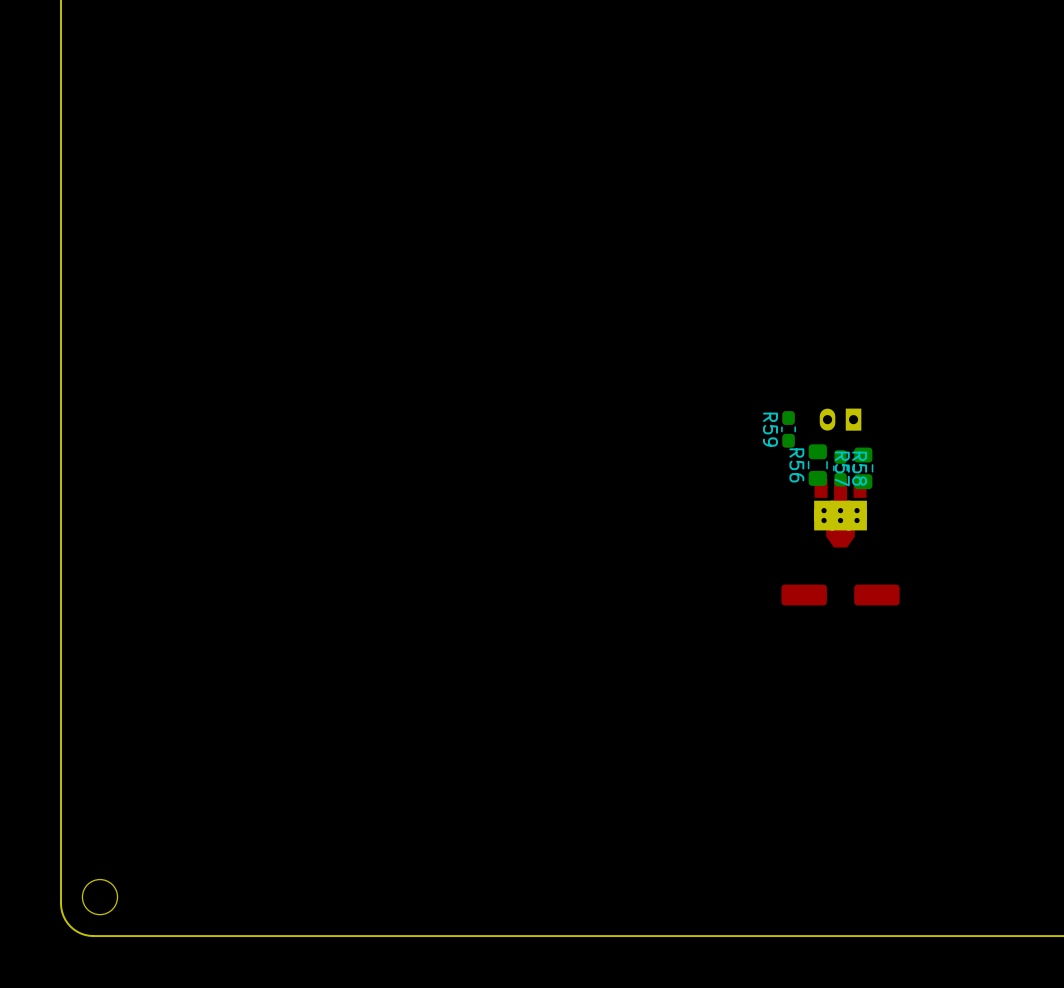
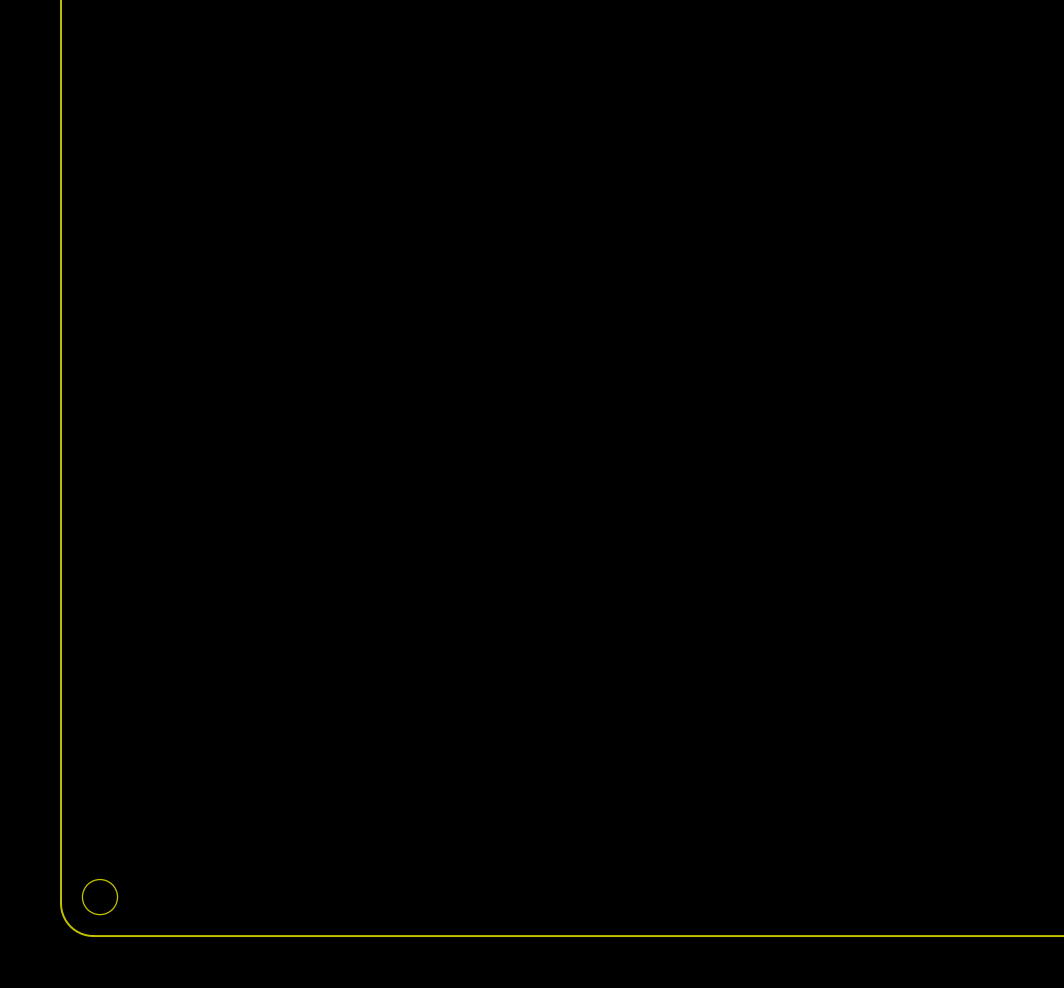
part: (840, 419) -> none
R59: (788, 429) -> none
R56: (817, 465) -> none
R58: (840, 468) -> none
R57: (863, 468) -> none
part: (840, 512) -> none
part: (840, 595) -> none

